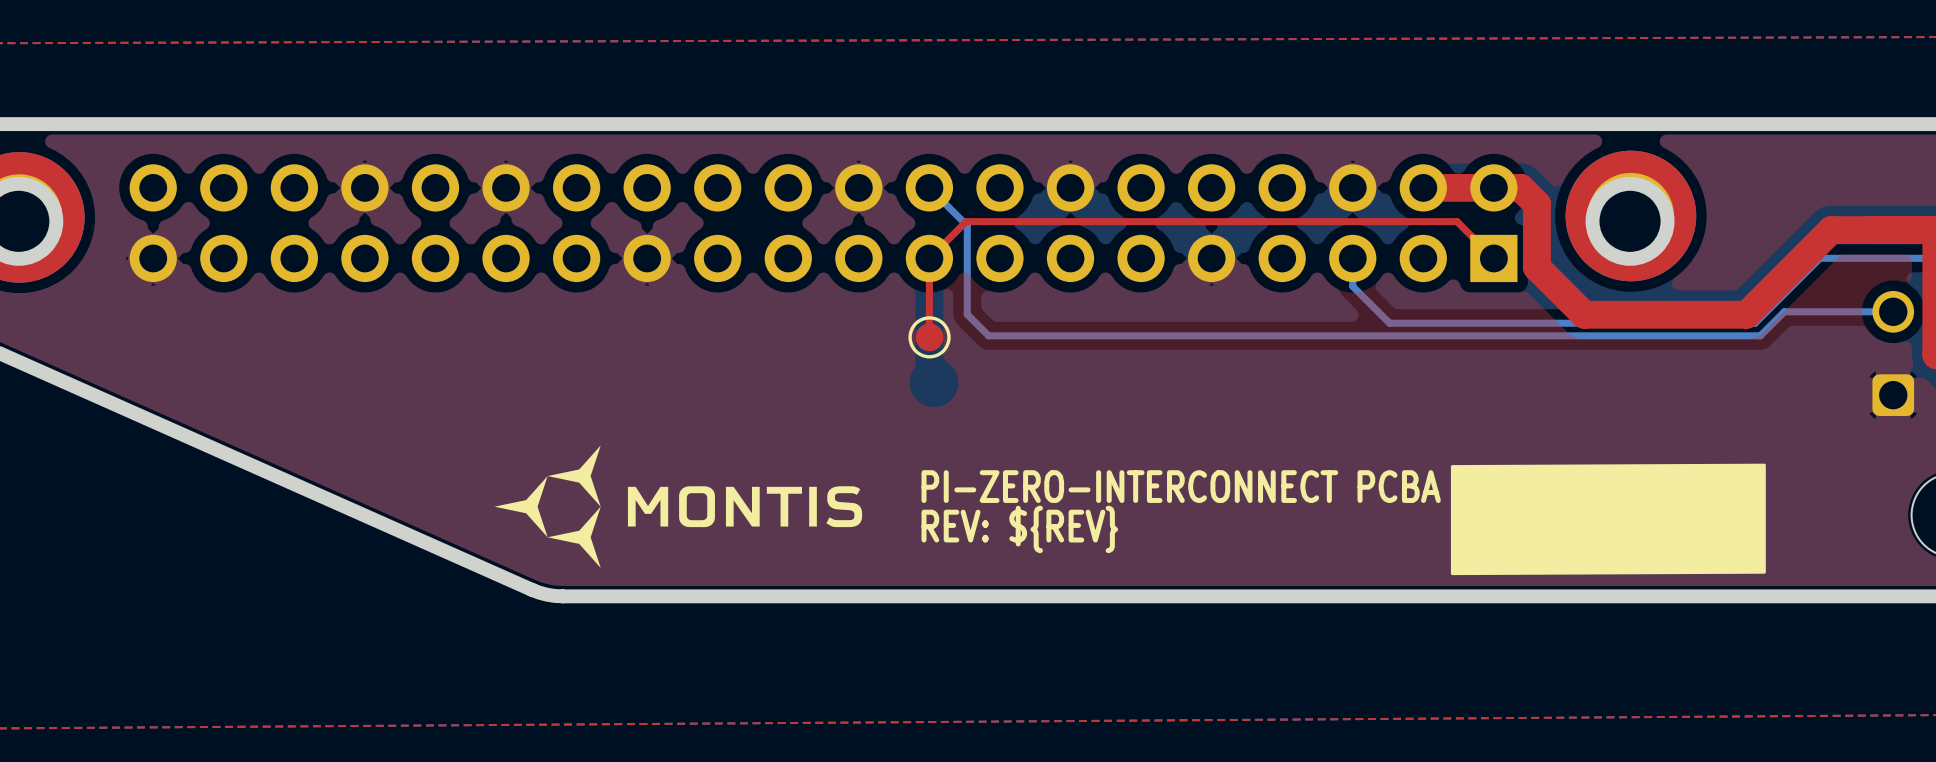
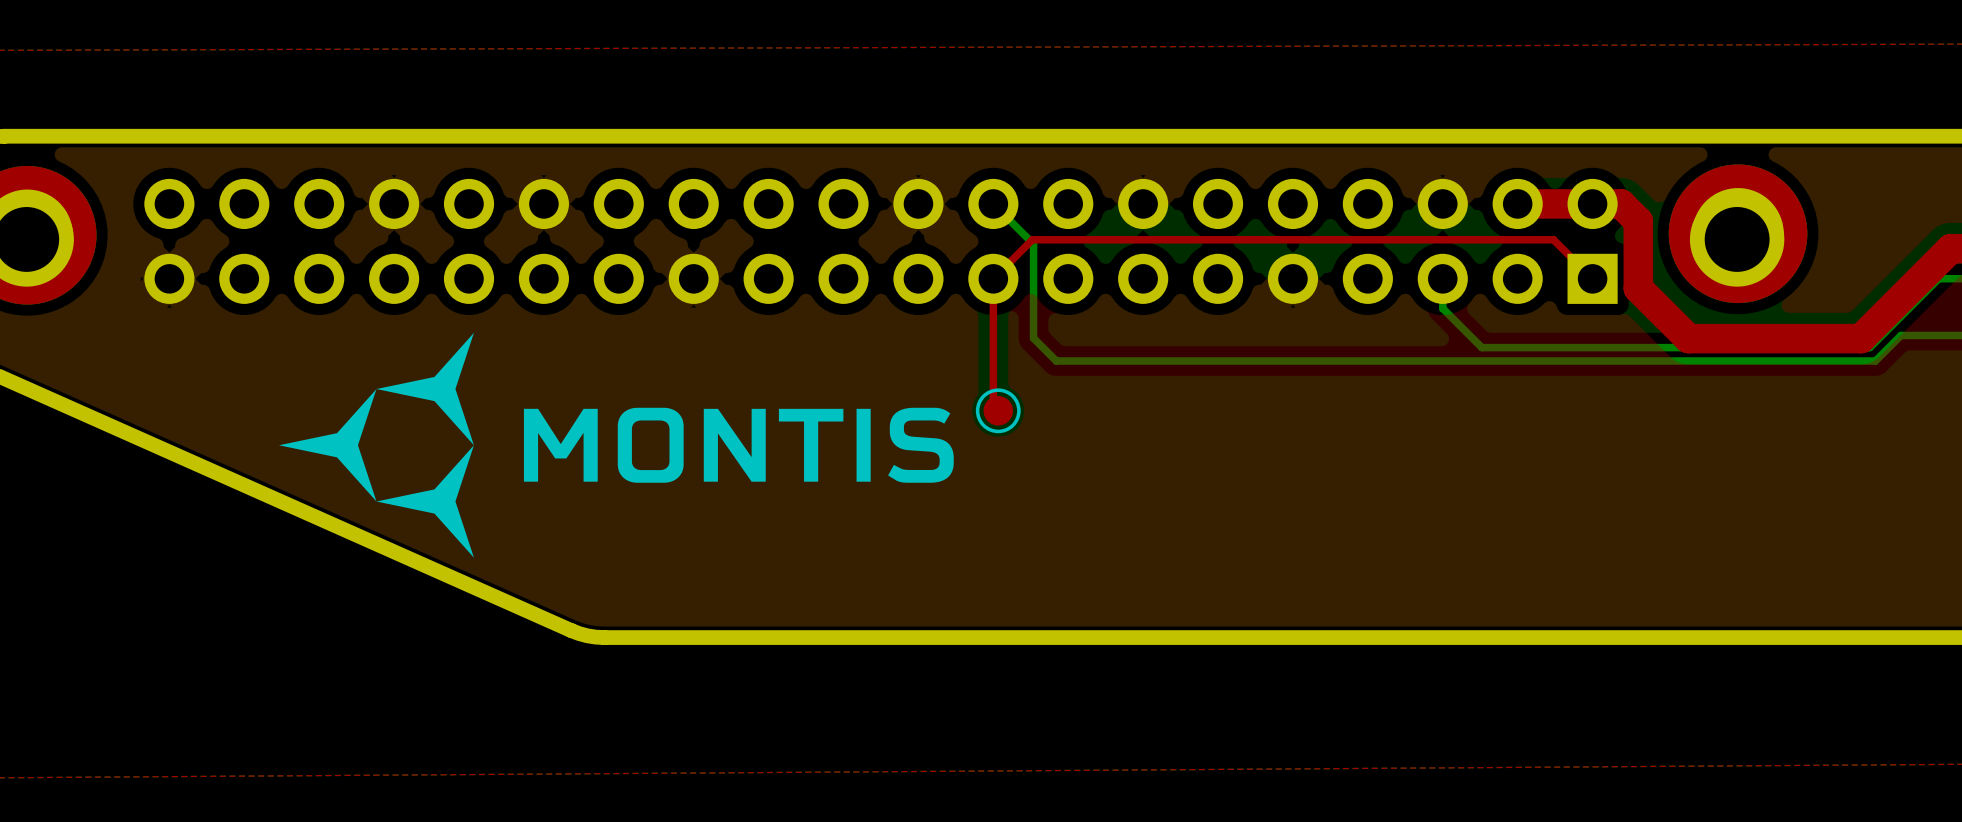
drawing: none -> [279, 332, 474, 558]
top track: none -> (993, 362) (993, 405) (998, 410)
part position: (929, 337) -> (998, 410)
drawing: none -> [523, 407, 954, 483]
drawing: [494, 445, 863, 568] -> none
drawing: [1450, 463, 1766, 576] -> none
text: PI-ZERO-INTERCONNECT PCBA (1181, 486) -> none
text: REV: ${REV} (1019, 529) -> none

